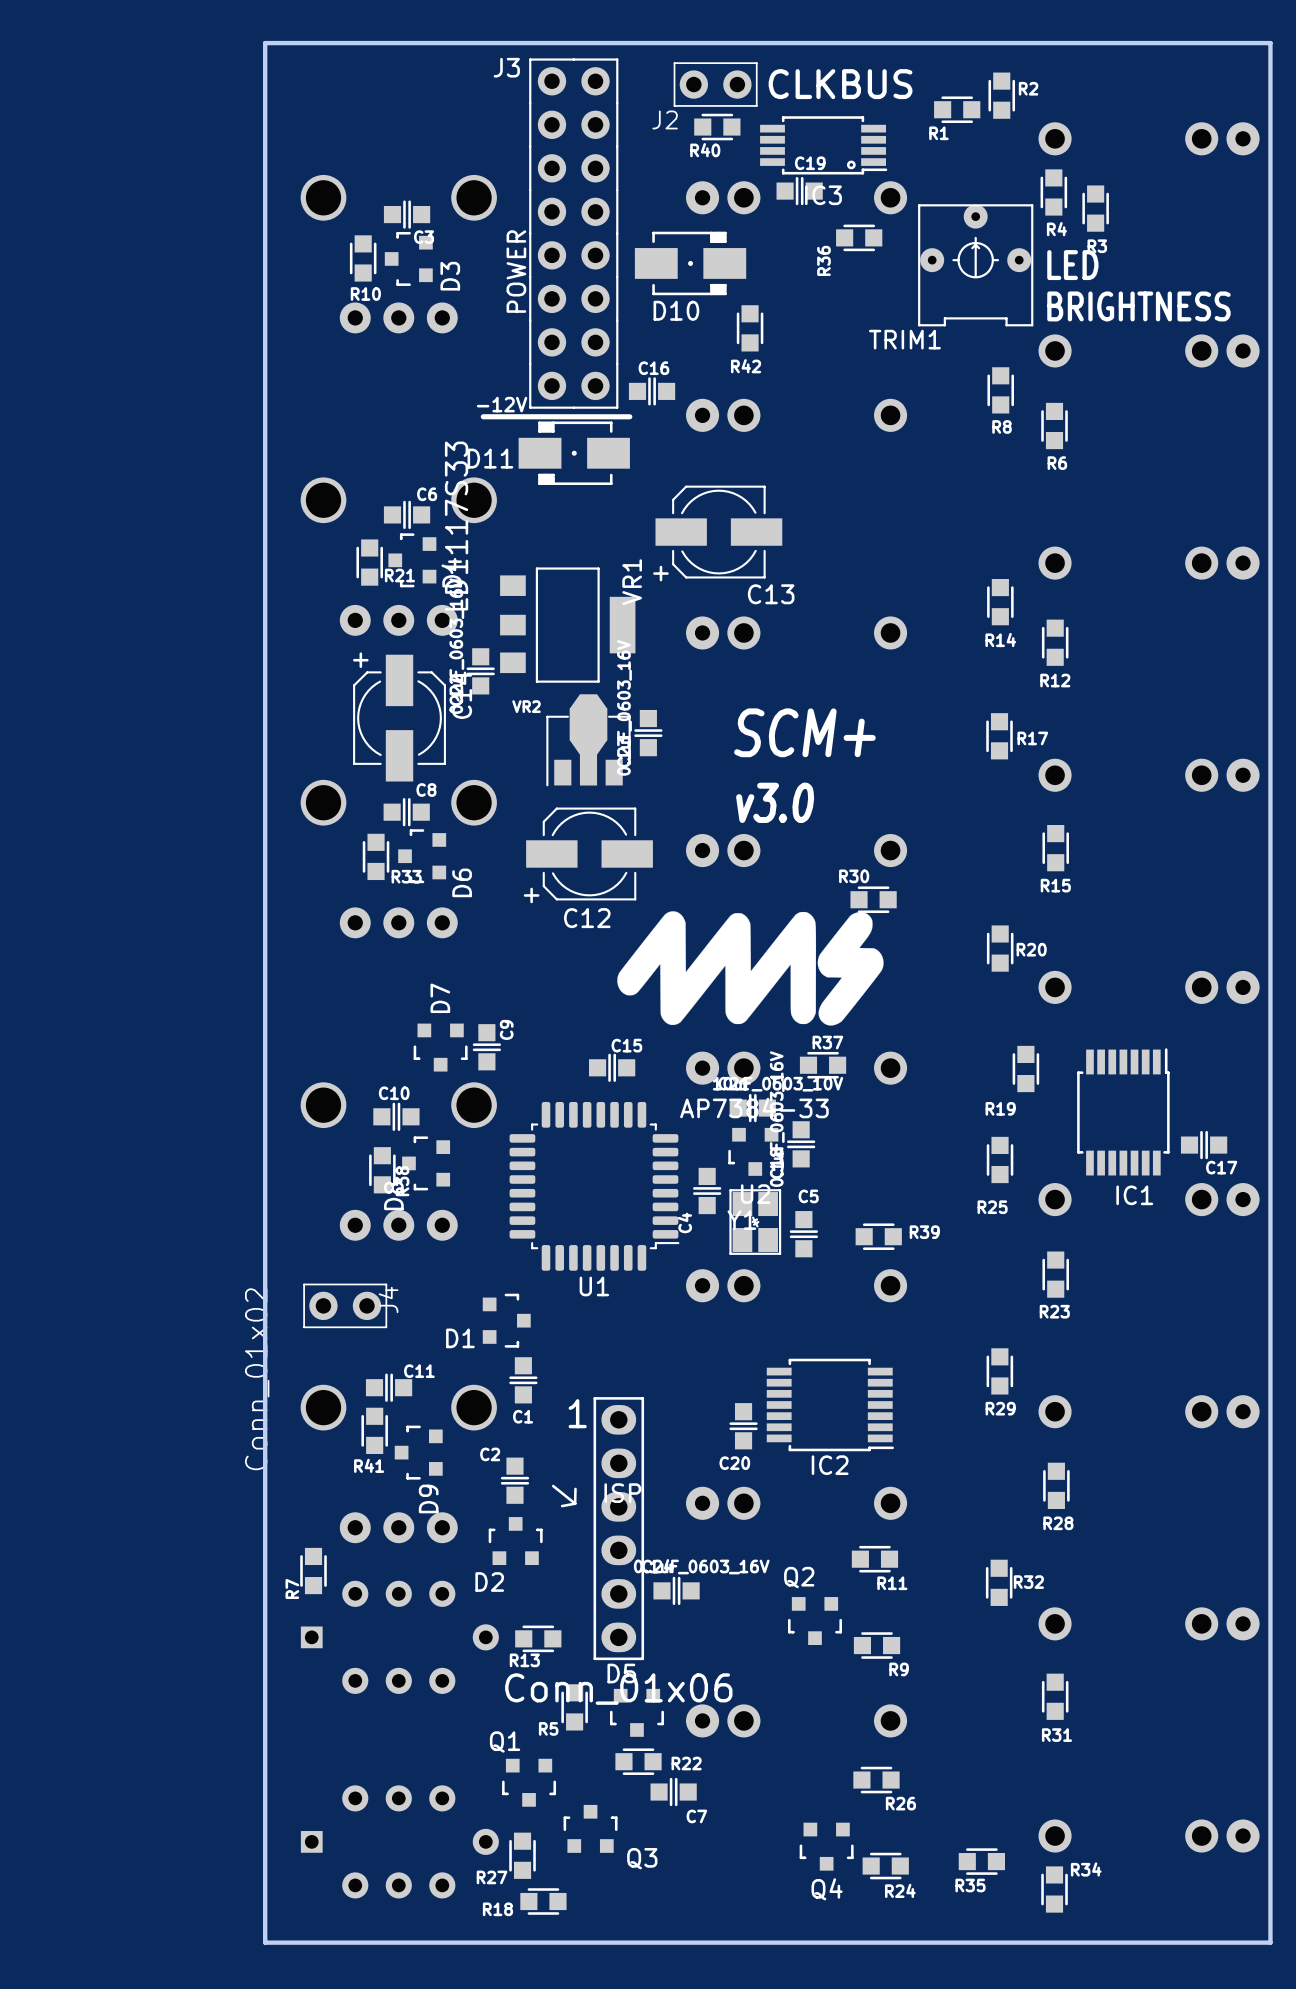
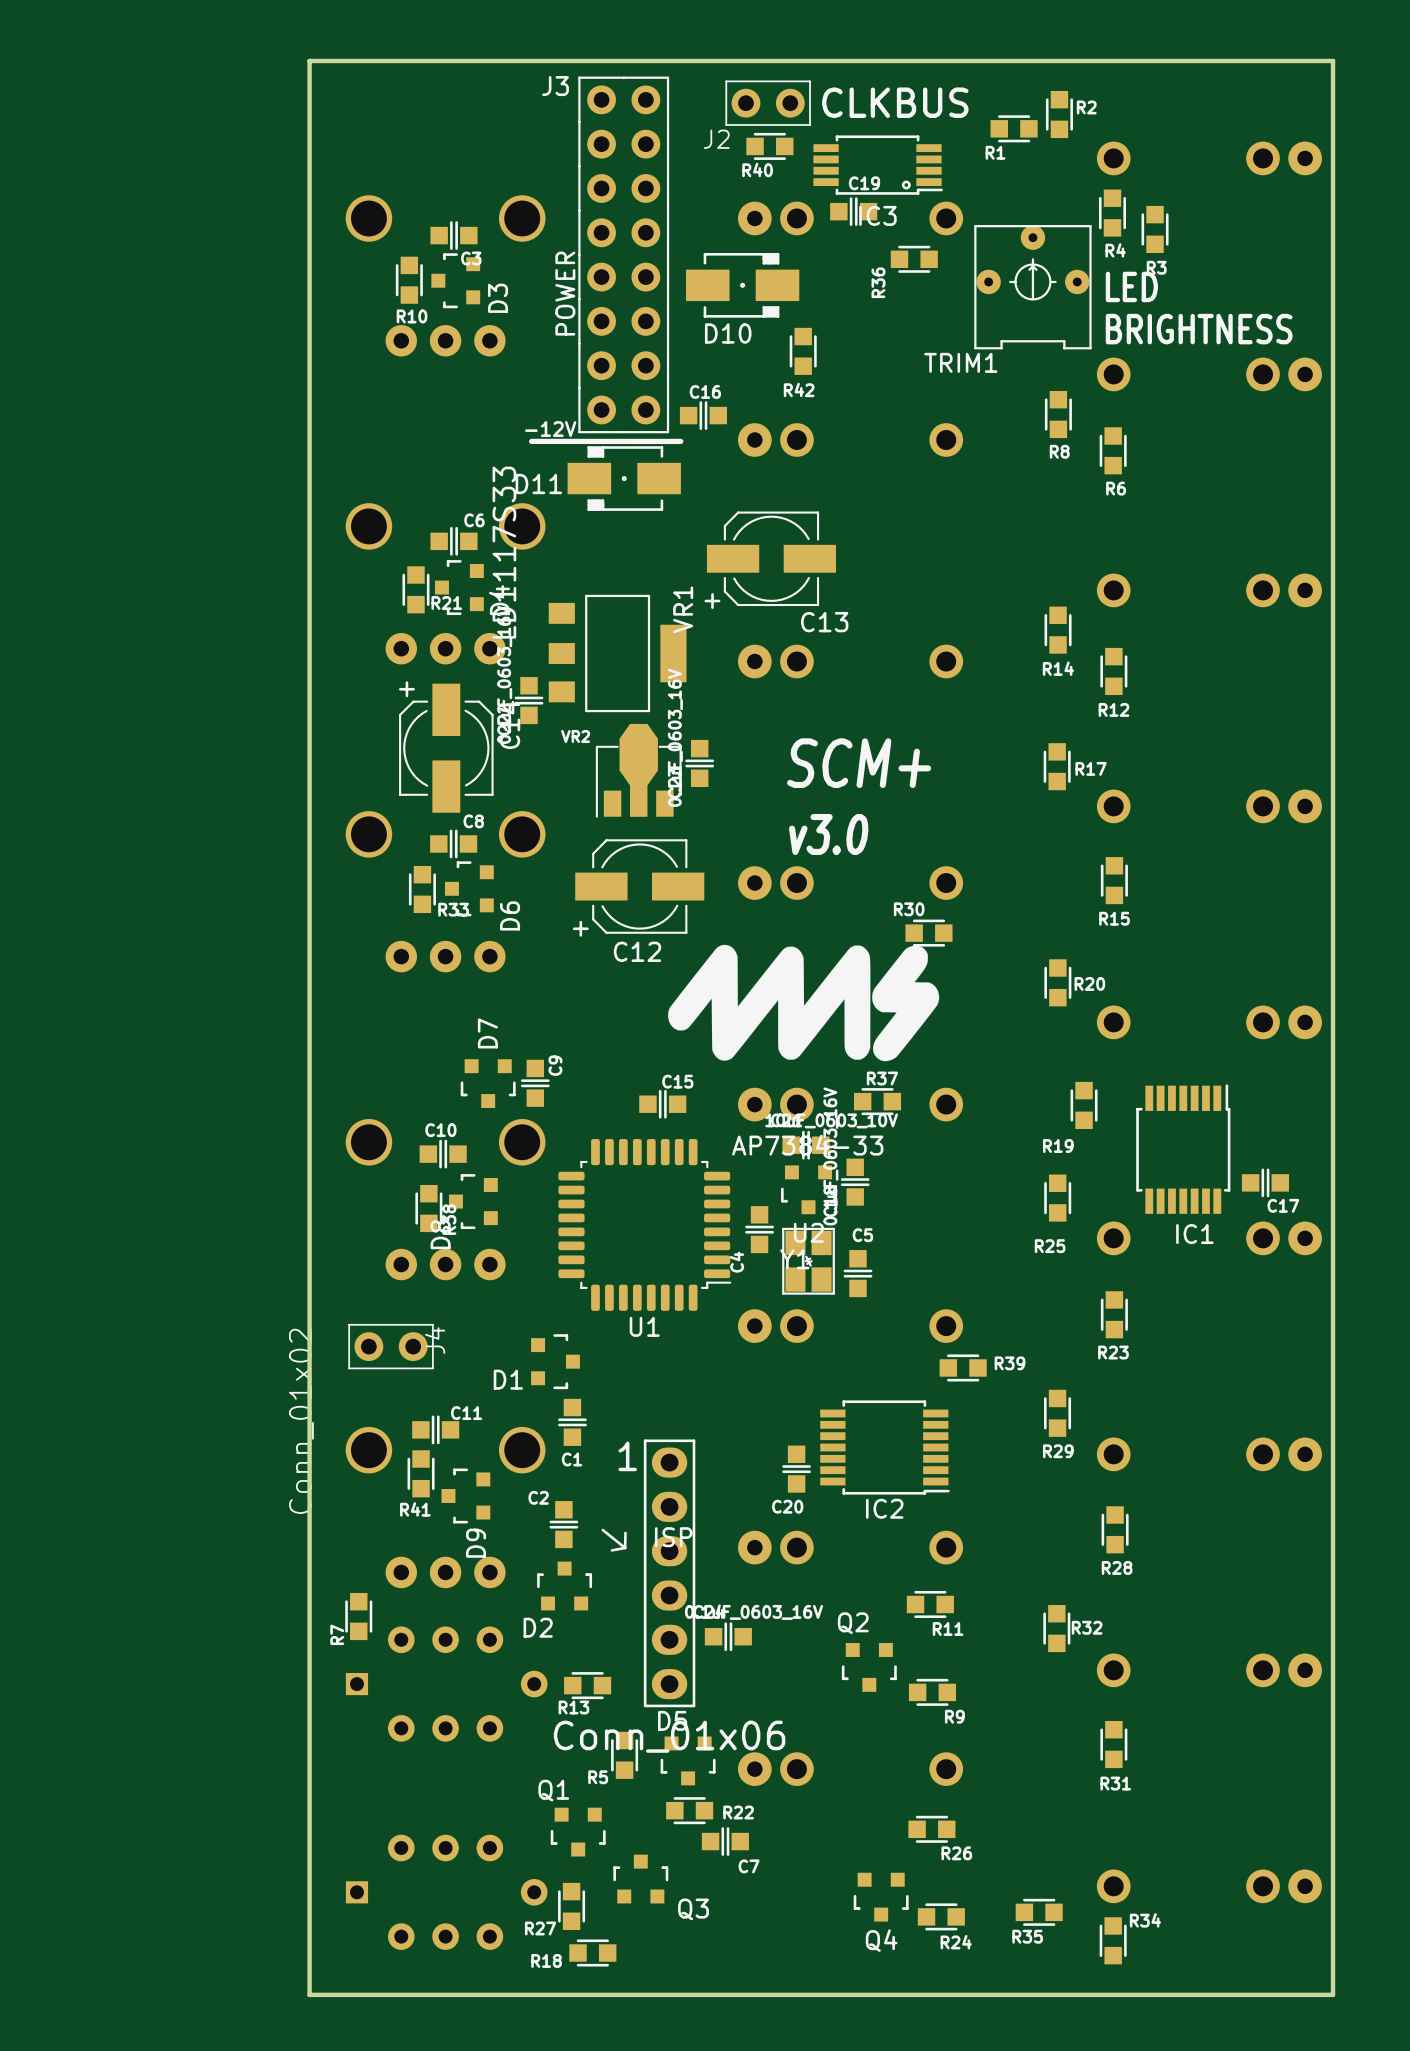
R39 position: (878, 1236) -> (963, 1367)

